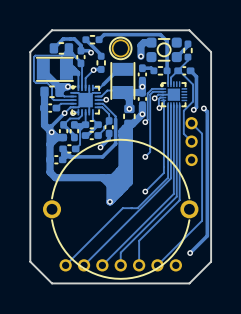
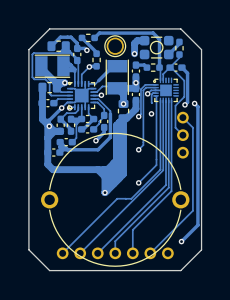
via: (159, 108) -> none
via: (142, 114) -> none
via: none -> (151, 113)

